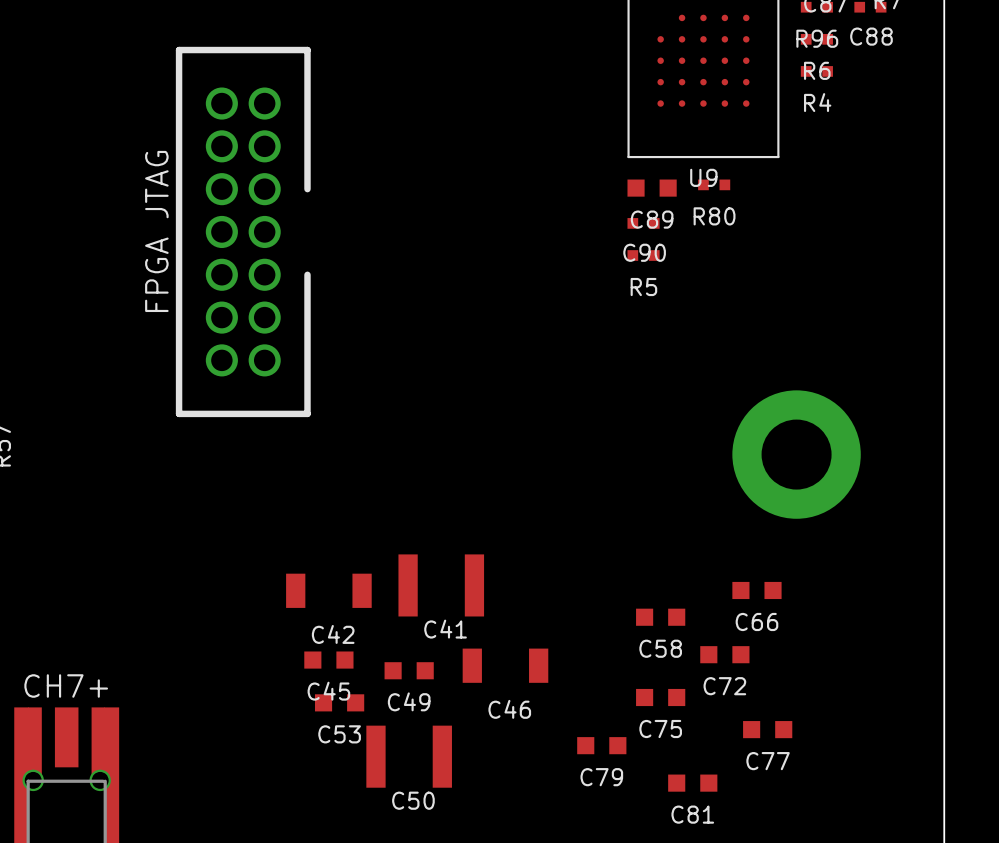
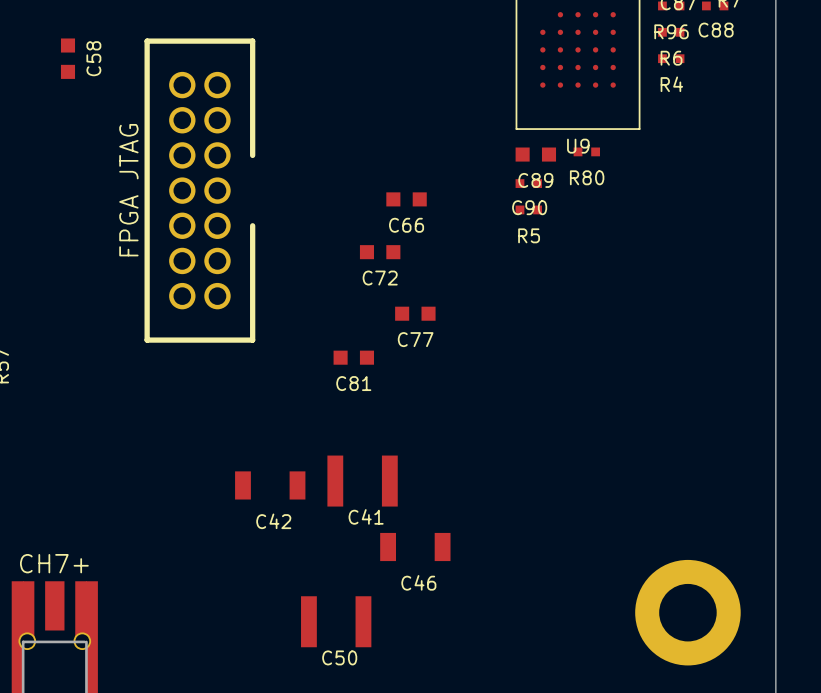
part position: (796, 454) -> (687, 612)
C66 position: (756, 590) -> (406, 199)
C58 rotation: 0° (660, 617) -> 90° clockwise (67, 58)
C58 position: (660, 617) -> (67, 58)
C58 name position: C58 (660, 648) -> C58 (93, 58)
C72 position: (724, 654) -> (380, 252)
C45: (328, 660) -> none
C49: (409, 670) -> none
C75: (660, 697) -> none
C53: (339, 702) -> none
C77 position: (767, 729) -> (415, 313)
C79: (601, 745) -> none
C81 position: (692, 783) -> (353, 357)

